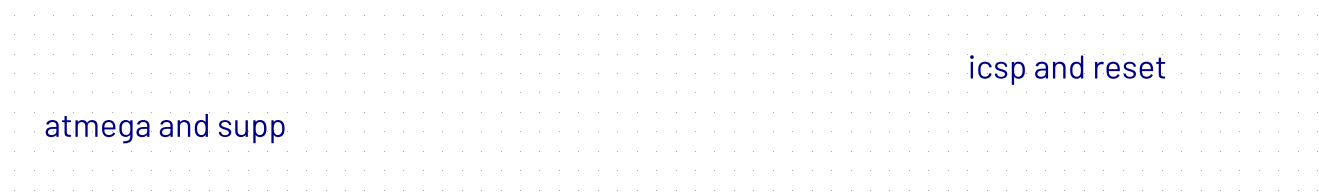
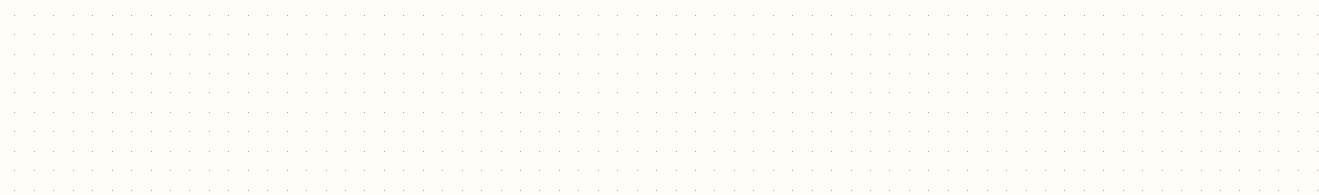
text: icsp and reset (1067, 70) -> none
text: atmega and supp (165, 128) -> none

